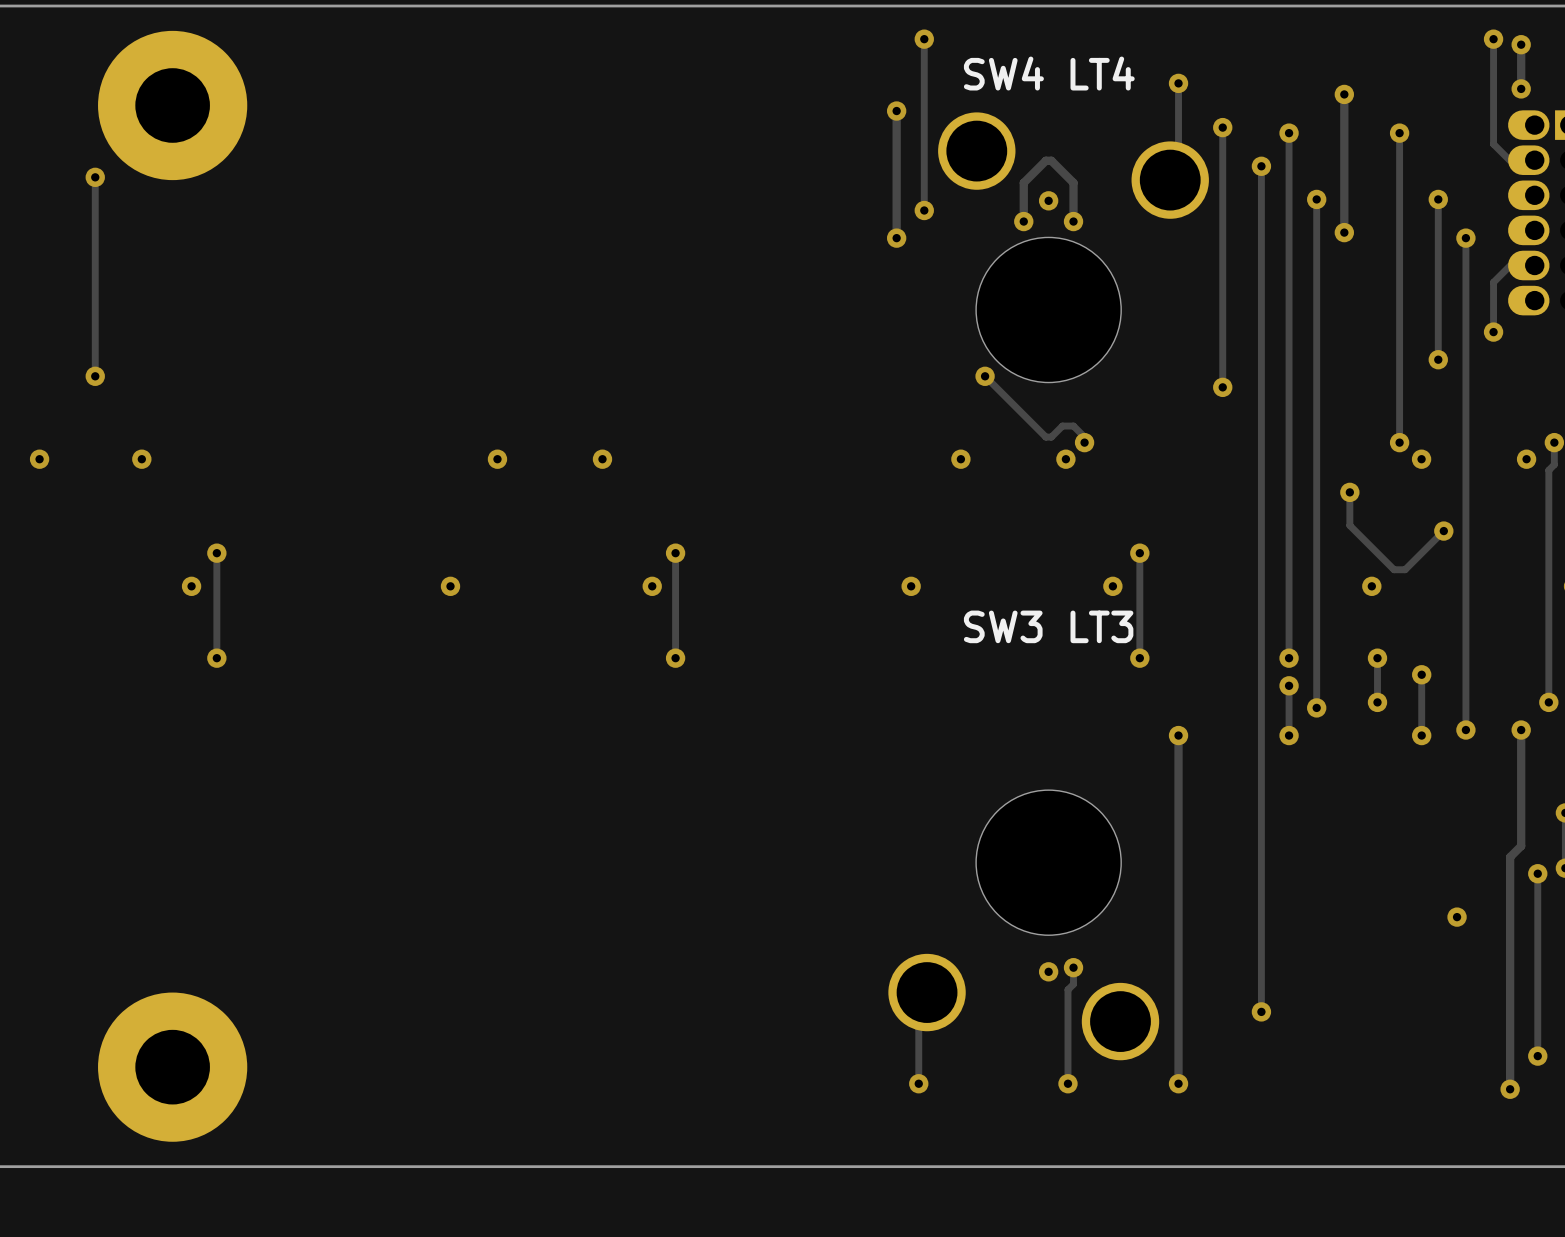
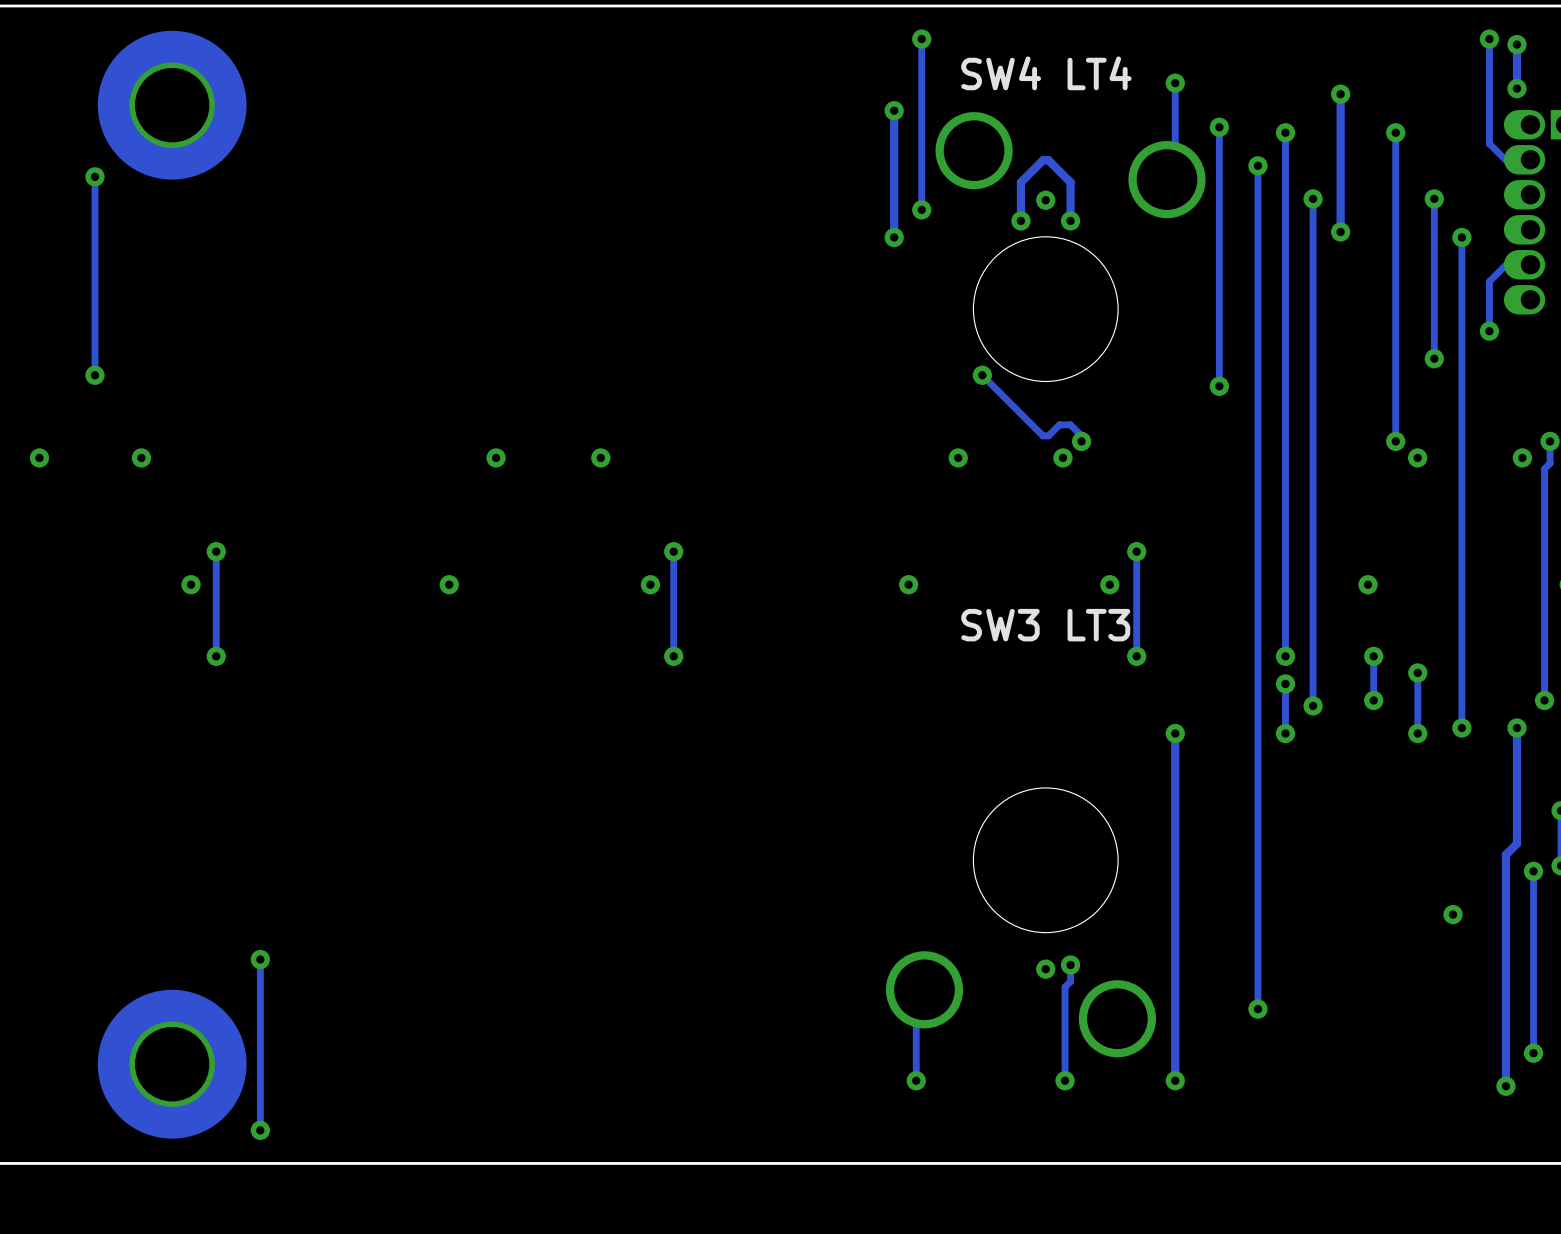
track: (1349, 492) (1349, 525) (1394, 569) (1405, 569) (1443, 531) -> none
via: (1349, 492) -> none
via: (1443, 531) -> none
track: none -> (260, 959) (260, 1130)
via: none -> (260, 959)
via: none -> (260, 1130)

